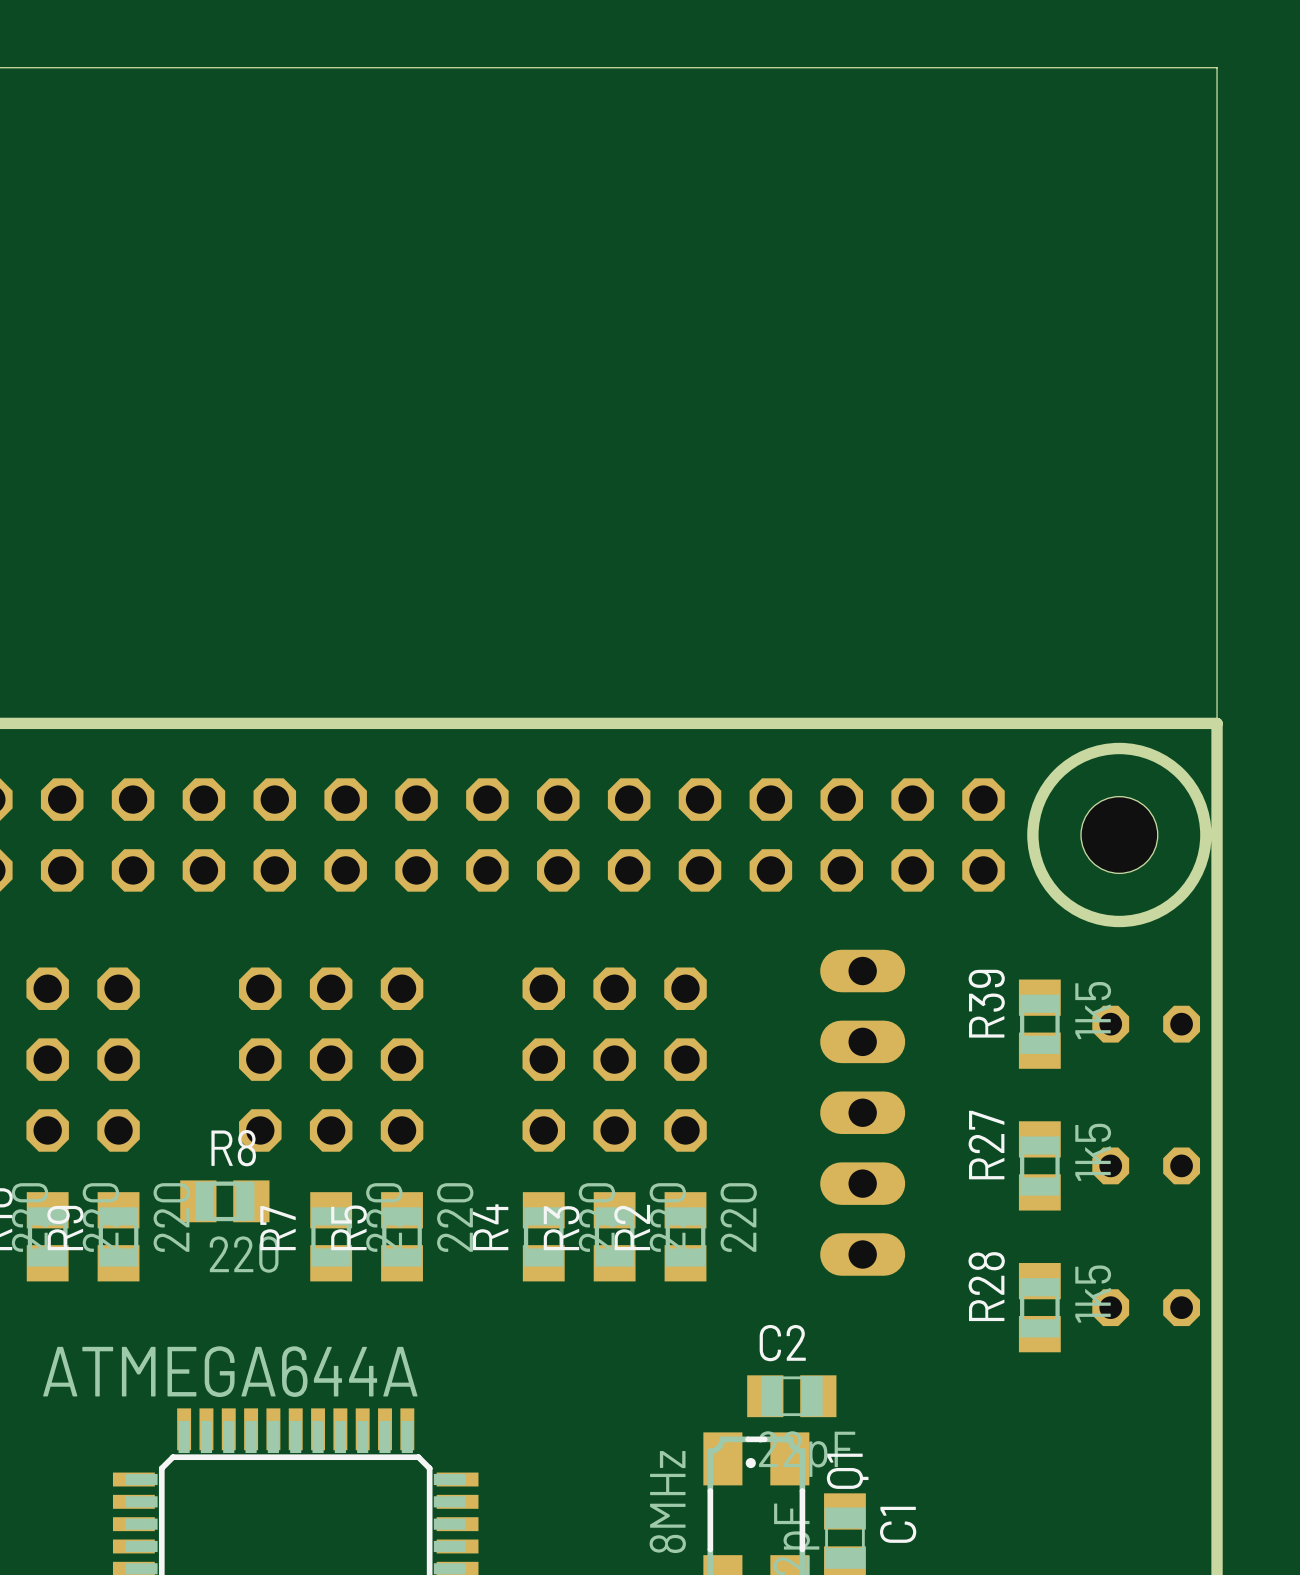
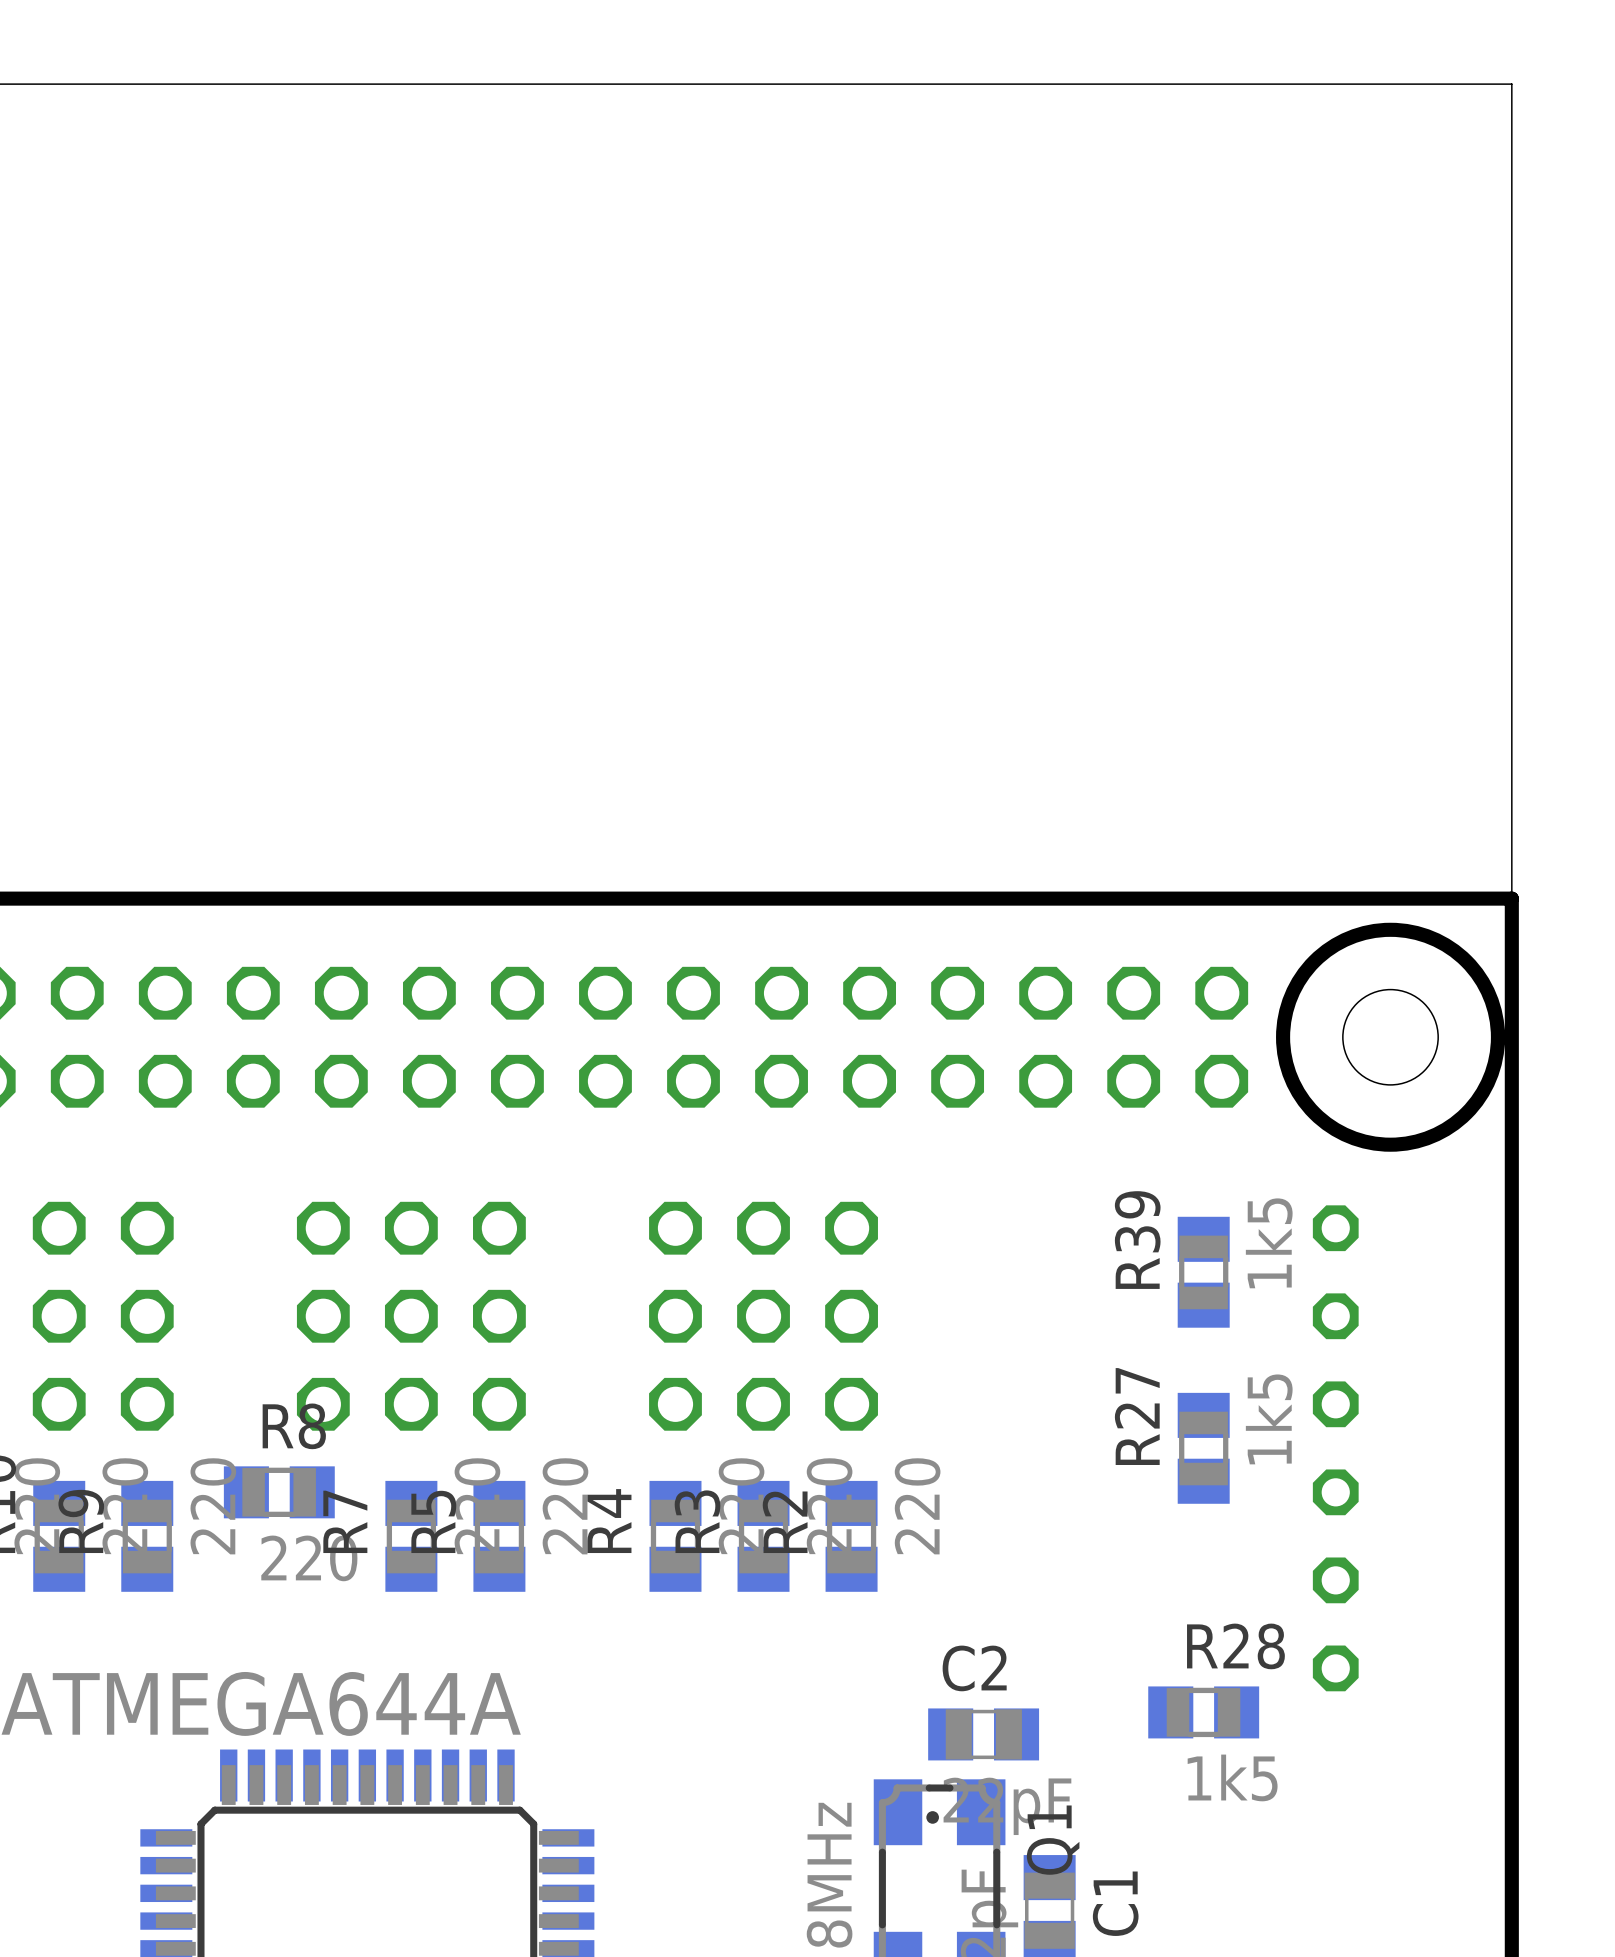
R39 position: (1039, 1024) -> (1203, 1272)
part rotation: 0° (1146, 1024) -> 90° clockwise (1335, 1272)
part position: (1146, 1024) -> (1335, 1272)
part: (862, 1112) -> none
R27 position: (1039, 1165) -> (1203, 1448)
part rotation: 0° (1146, 1165) -> 90° clockwise (1335, 1448)
part position: (1146, 1165) -> (1335, 1448)
R28 rotation: 0° (1039, 1307) -> 90° clockwise (1203, 1712)
R28 position: (1039, 1307) -> (1203, 1712)
part rotation: 0° (1146, 1307) -> 90° clockwise (1335, 1624)
part position: (1146, 1307) -> (1335, 1624)

